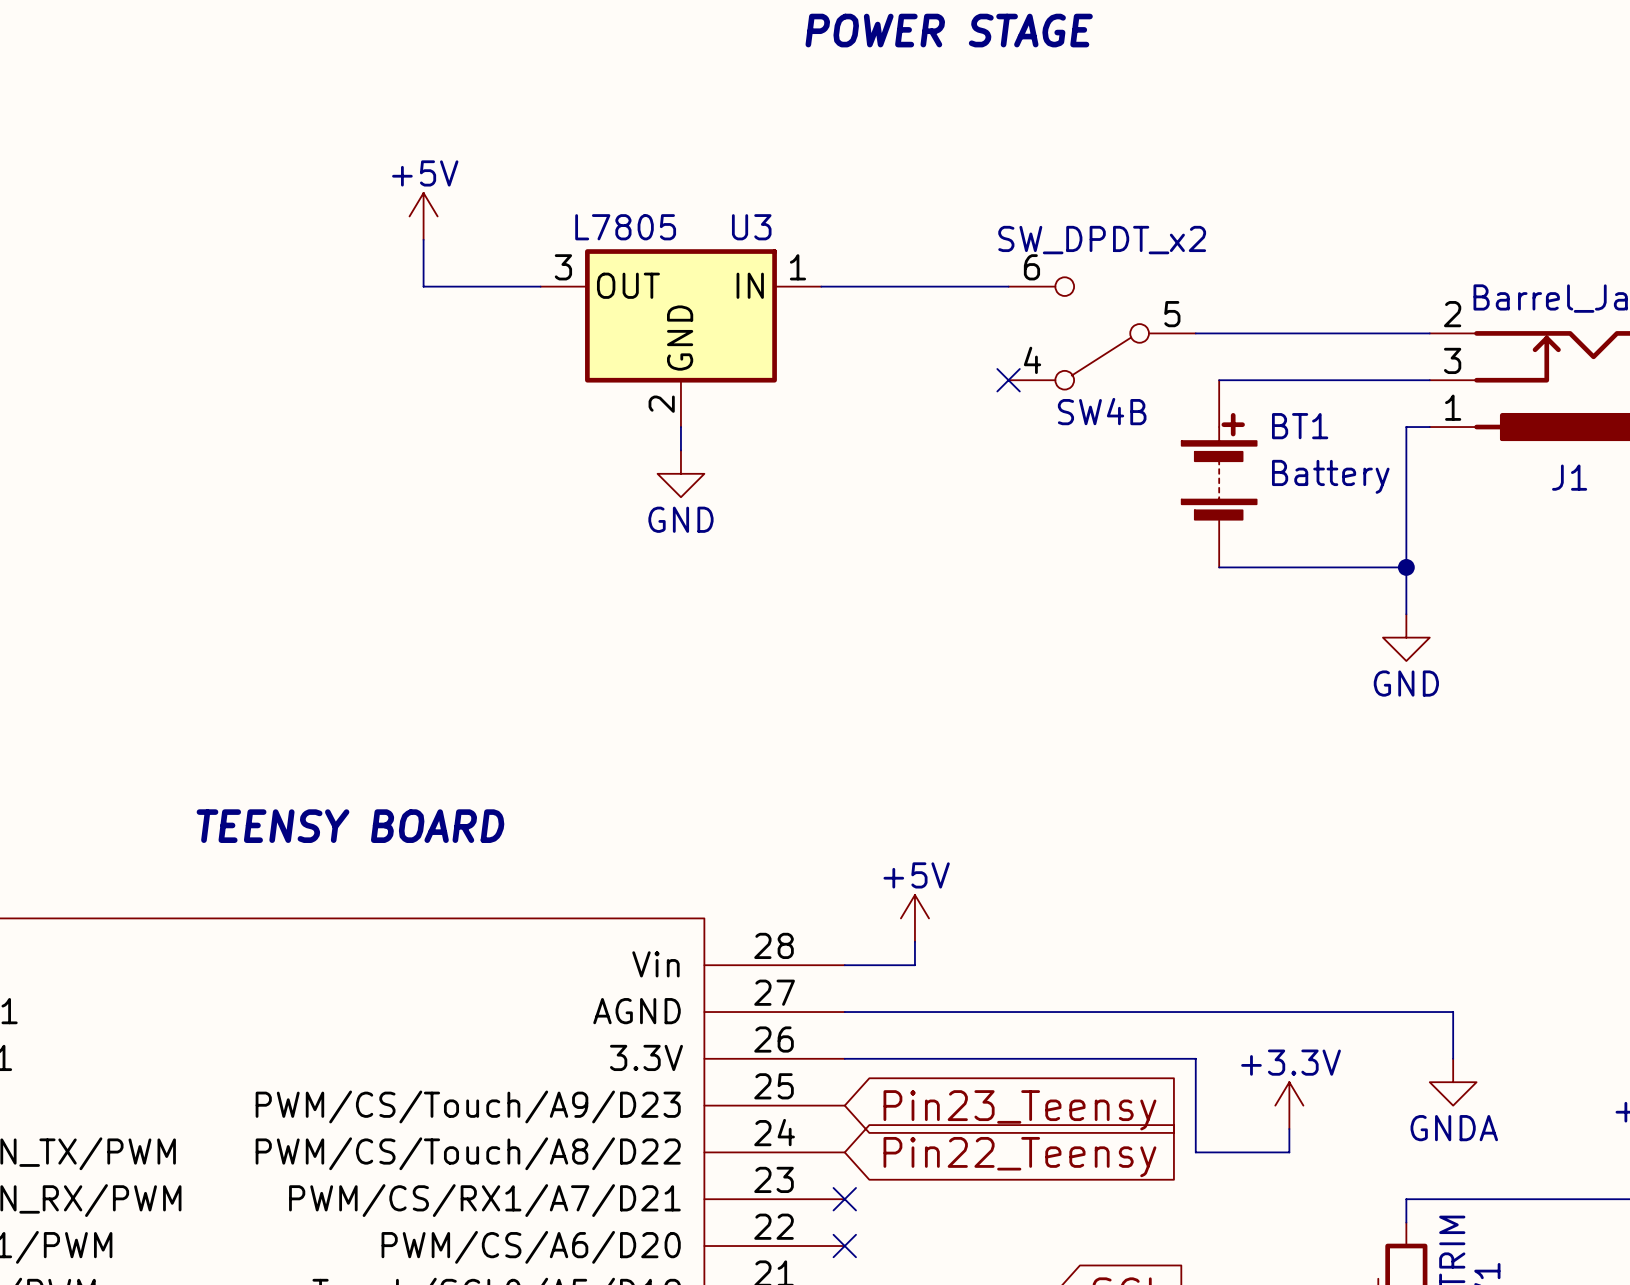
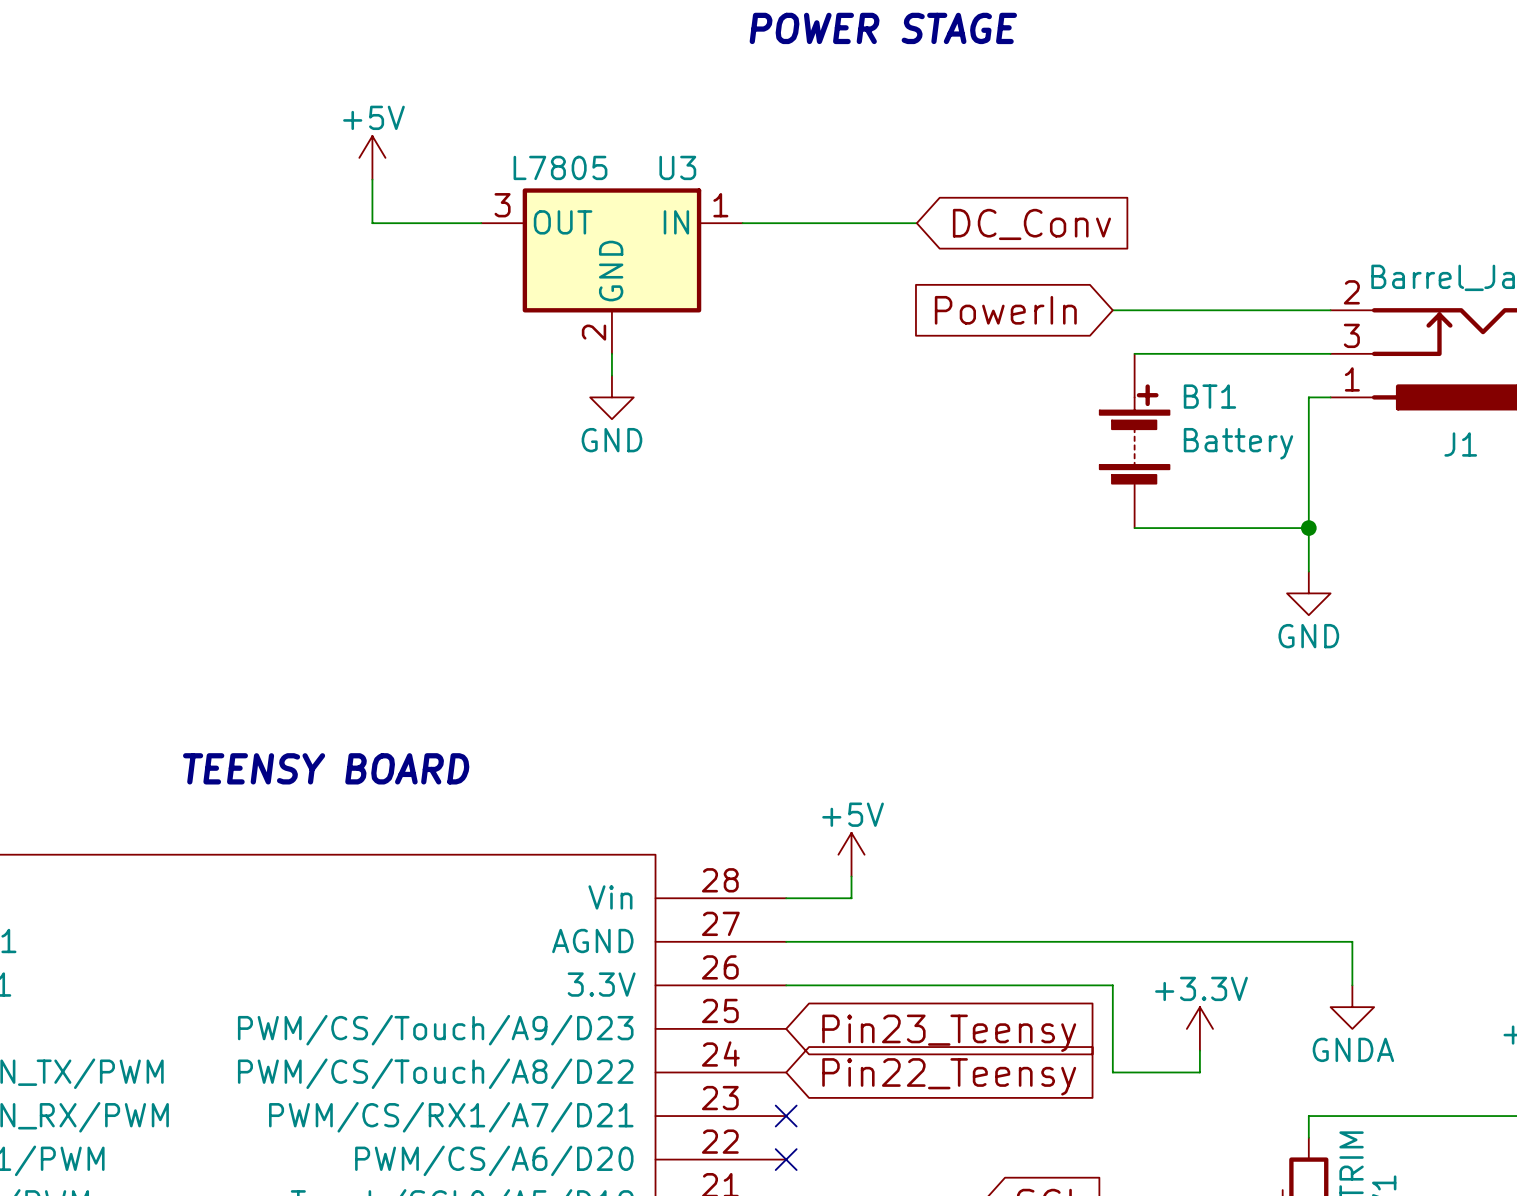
power symbol position: +5V (423, 216) -> +5V (372, 157)
wire: (423, 239) (423, 286) (540, 286) -> (372, 179) (372, 223) (481, 223)
global label: none -> DC_Conv (1031, 224)
wire: (821, 286) (1008, 286) -> (742, 223) (916, 223)
global label: none -> PowerIn (1005, 310)
SW4B: SW_DPDT_x2 (1102, 333) -> none
U3 position: (680, 338) -> (611, 271)
no-connect mark: (1008, 380) -> none
wire: (680, 427) (680, 450) -> (611, 353) (611, 375)
power symbol position: GND (680, 473) -> GND (611, 397)

